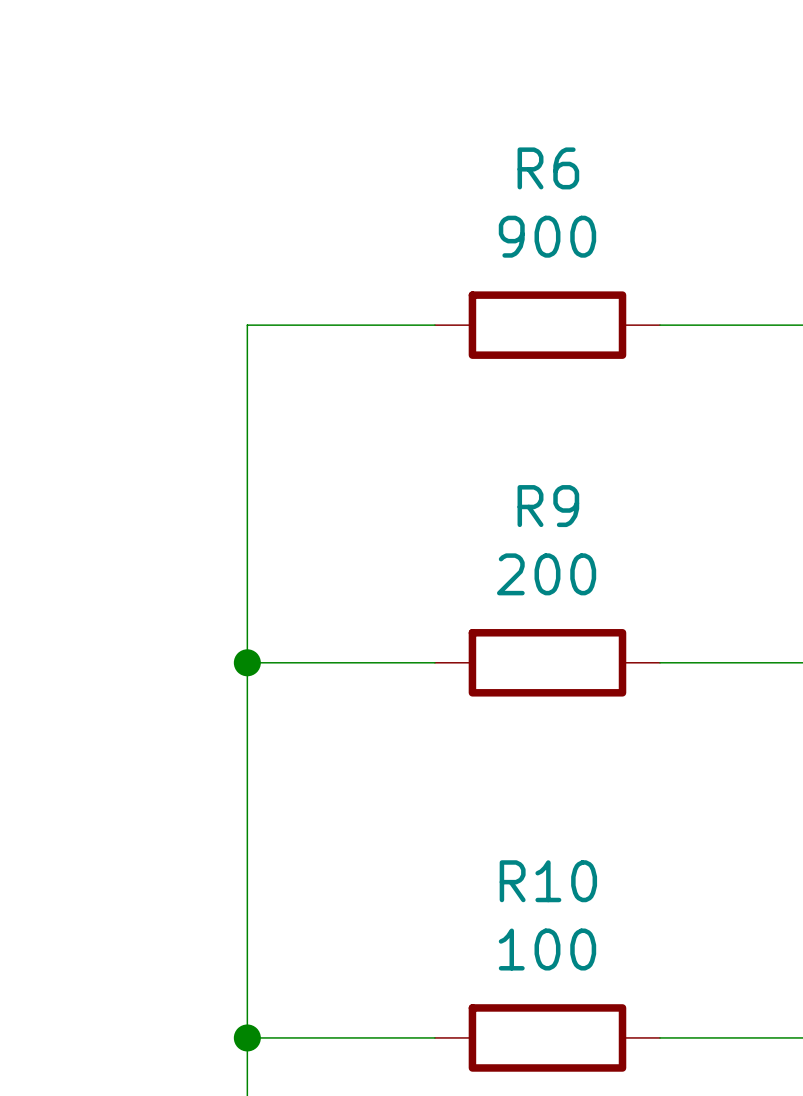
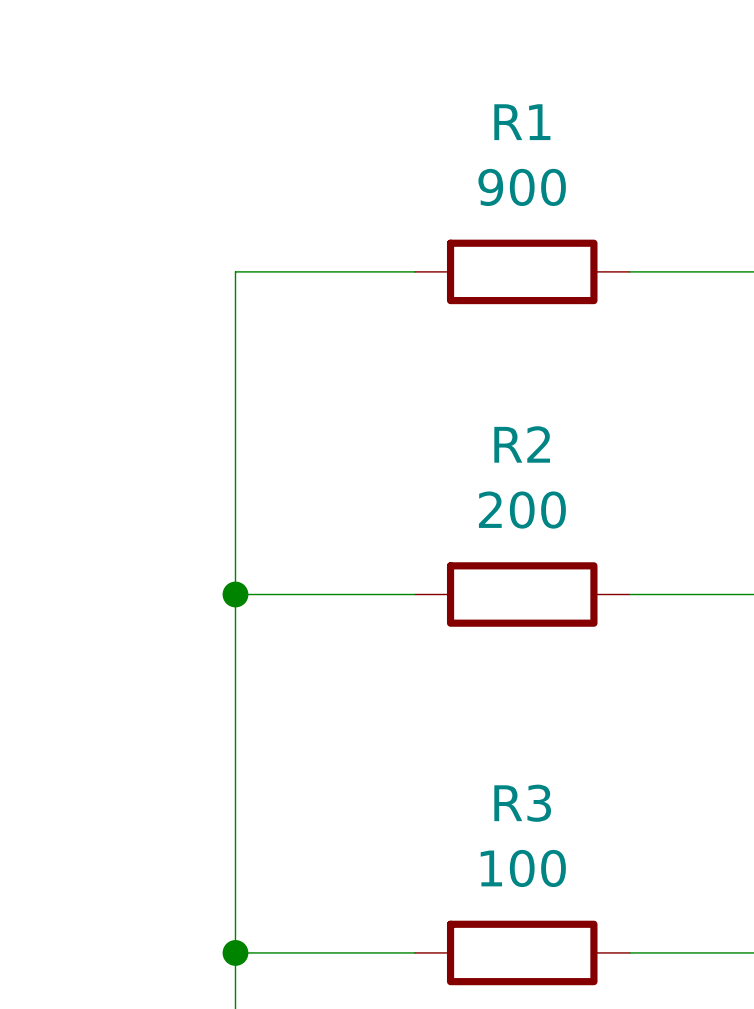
R6 name: R6 (548, 168) -> R1 (522, 122)
R9 name: R9 (548, 506) -> R2 (522, 444)
R10 name: R10 (548, 881) -> R3 (522, 803)

